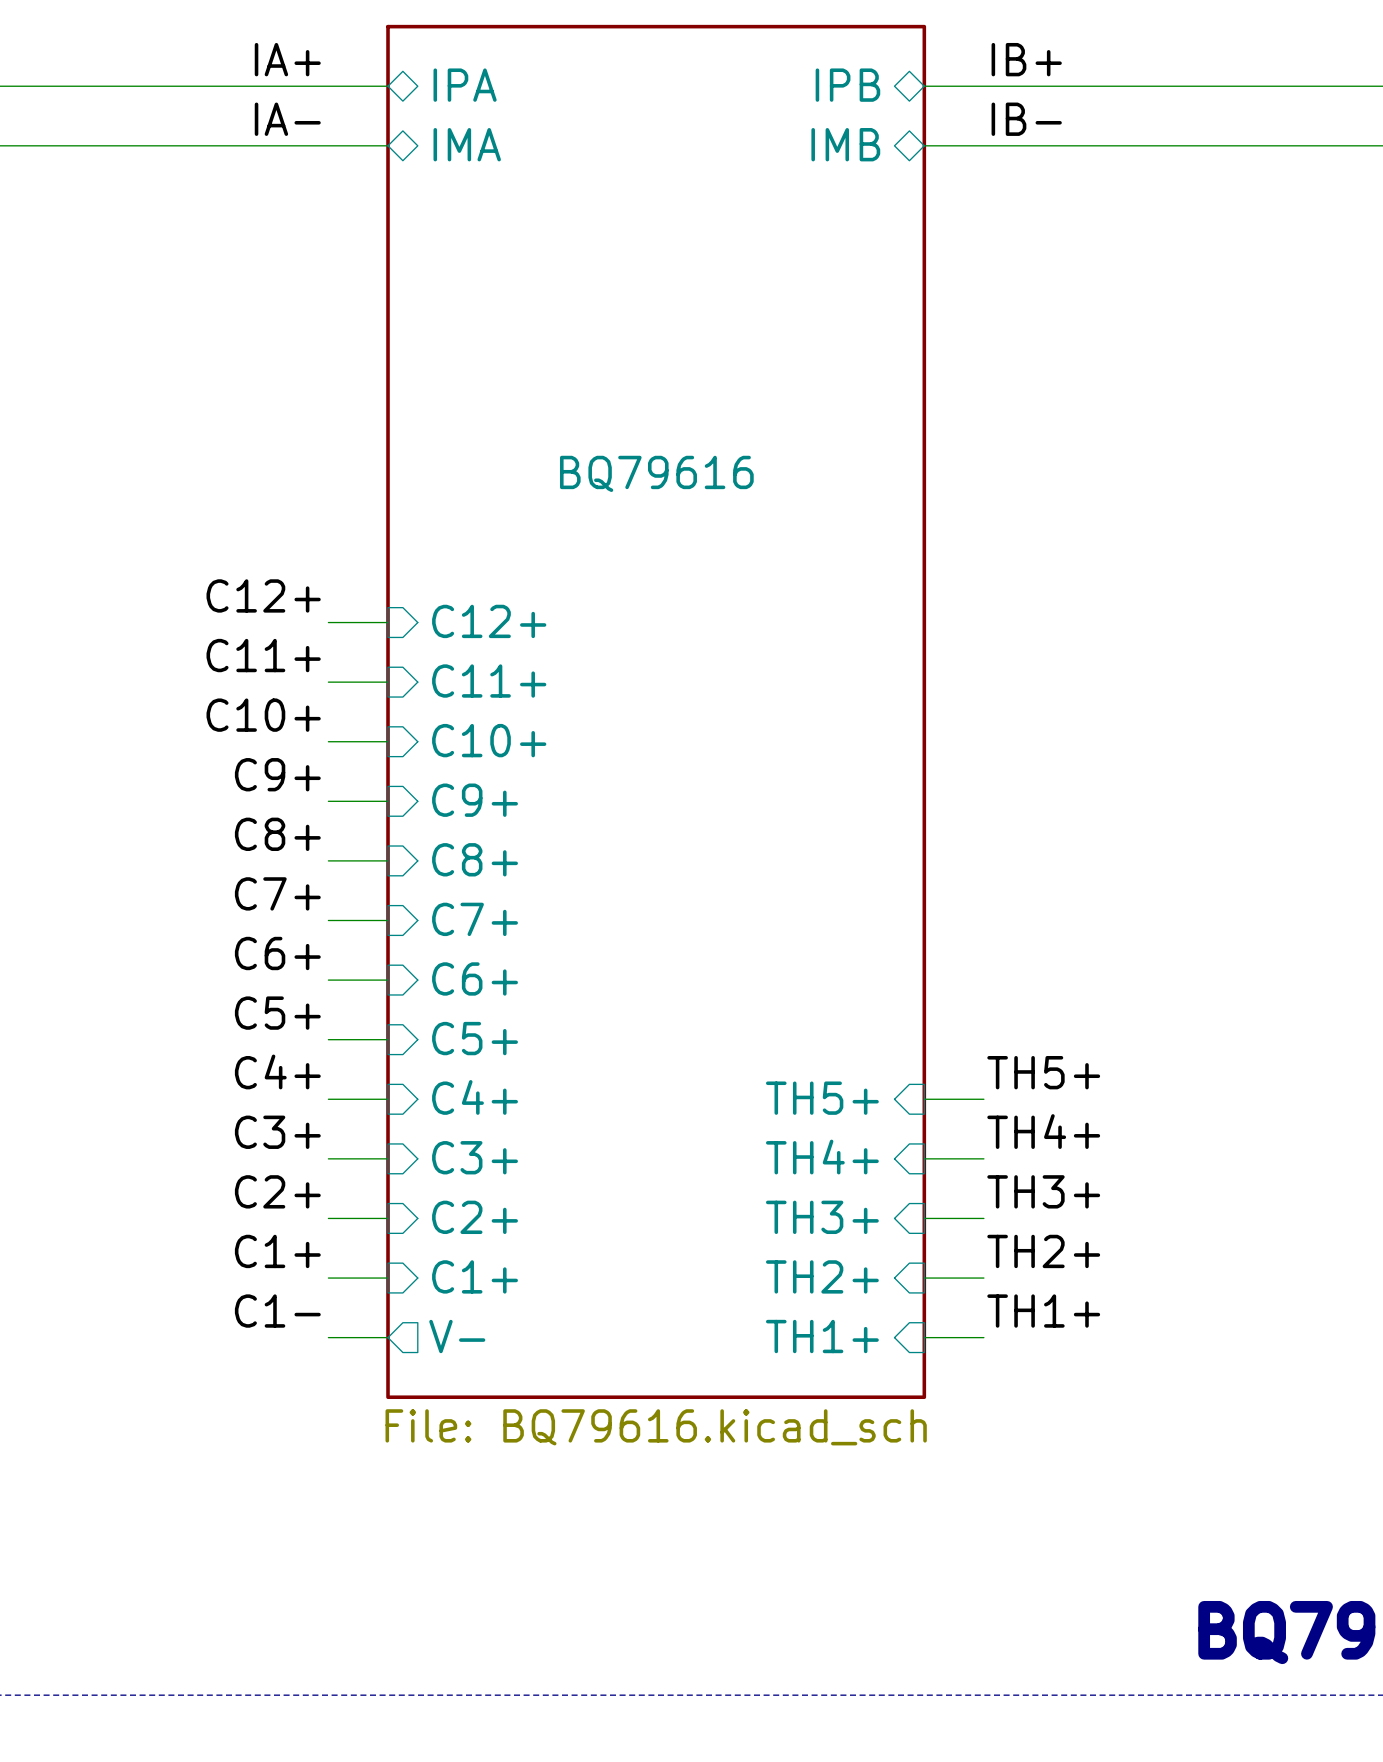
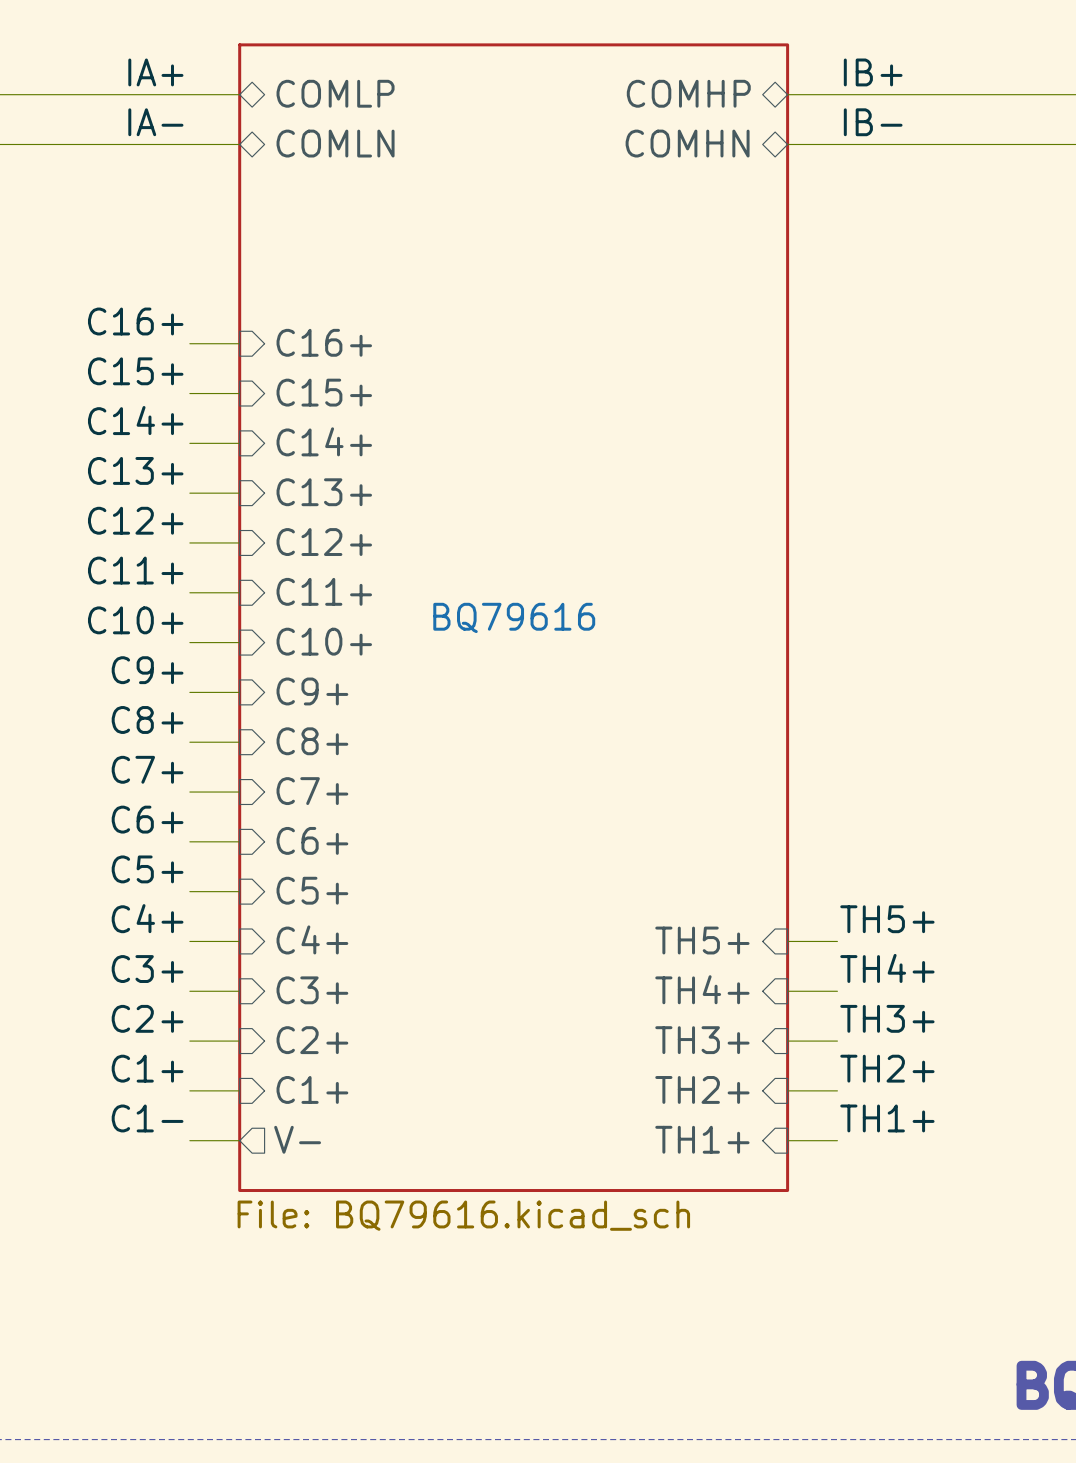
sheet BQ79616 shape: [386, 24, 927, 1400] -> [238, 43, 790, 1193]
label position: IA+ (287, 59) -> IA+ (155, 72)
sheet pin: none -> COMLP (335, 93)
sheet pin: IPA (465, 85) -> none
sheet pin: IPB (847, 85) -> COMHP (688, 93)
wire: (268, 86) (388, 86) -> none
label position: IA- (287, 119) -> IA- (155, 122)
sheet pin: none -> COMLN (335, 143)
sheet pin: IMA (467, 144) -> none
sheet pin: IMB (845, 144) -> COMHN (687, 143)
wire: (268, 145) (388, 145) -> none
label: none -> C16+ (135, 321)
sheet pin: none -> C16+ (324, 342)
wire: none -> (189, 343) (239, 343)
label: none -> C15+ (135, 371)
sheet pin: none -> C15+ (324, 392)
wire: none -> (189, 393) (239, 393)
sheet BQ79616 name position: BQ79616 (656, 473) -> BQ79616 (514, 617)
label: none -> C14+ (135, 420)
sheet pin: none -> C14+ (324, 441)
wire: none -> (189, 443) (239, 443)
label: none -> C13+ (135, 470)
sheet pin: none -> C13+ (324, 492)
wire: none -> (189, 493) (239, 493)
label position: C12+ (263, 595) -> C12+ (135, 520)
sheet pin position: C12+ (489, 621) -> C12+ (324, 542)
wire: (328, 622) (388, 622) -> (189, 542) (239, 542)
label position: C11+ (263, 655) -> C11+ (135, 570)
sheet pin position: C11+ (489, 681) -> C11+ (324, 591)
wire: (328, 682) (388, 682) -> (189, 592) (239, 592)
label position: C10+ (263, 715) -> C10+ (135, 620)
sheet pin position: C10+ (489, 740) -> C10+ (324, 641)
wire: (328, 741) (388, 741) -> (189, 642) (239, 642)
label position: C9+ (277, 774) -> C9+ (147, 670)
sheet pin position: C9+ (475, 800) -> C9+ (312, 691)
wire: (328, 801) (388, 801) -> (189, 692) (239, 692)
label position: C8+ (277, 834) -> C8+ (147, 719)
sheet pin position: C8+ (475, 859) -> C8+ (312, 741)
wire: (328, 860) (388, 860) -> (189, 742) (239, 742)
label position: C7+ (277, 893) -> C7+ (147, 769)
sheet pin position: C7+ (475, 919) -> C7+ (312, 791)
wire: (328, 920) (388, 920) -> (189, 792) (239, 792)
label position: C6+ (277, 953) -> C6+ (147, 819)
sheet pin position: C6+ (475, 978) -> C6+ (312, 840)
wire: (328, 980) (388, 980) -> (189, 841) (239, 841)
label position: C5+ (277, 1013) -> C5+ (147, 869)
sheet pin position: C5+ (475, 1038) -> C5+ (312, 890)
wire: (328, 1039) (388, 1039) -> (189, 891) (239, 891)
label position: C4+ (277, 1071) -> C4+ (147, 918)
sheet pin position: C4+ (475, 1097) -> C4+ (312, 939)
wire: (328, 1099) (388, 1099) -> (189, 941) (239, 941)
label position: C3+ (277, 1132) -> C3+ (147, 969)
sheet pin position: C3+ (475, 1157) -> C3+ (312, 990)
wire: (328, 1158) (388, 1158) -> (189, 991) (239, 991)
label position: C2+ (277, 1191) -> C2+ (147, 1018)
sheet pin position: C2+ (475, 1217) -> C2+ (312, 1040)
wire: (328, 1218) (388, 1218) -> (189, 1041) (239, 1041)
label position: C1+ (277, 1251) -> C1+ (147, 1068)
sheet pin position: C1+ (475, 1276) -> C1+ (312, 1089)
wire: (328, 1278) (388, 1278) -> (189, 1090) (239, 1090)
label position: C1- (277, 1311) -> C1- (147, 1118)
sheet pin position: V- (457, 1336) -> V- (297, 1139)
wire: (328, 1337) (388, 1337) -> (189, 1140) (239, 1140)
sheet BQ79616 value position: File: BQ79616.kicad_sch (656, 1427) -> File: BQ79616.kicad_sch (463, 1215)

